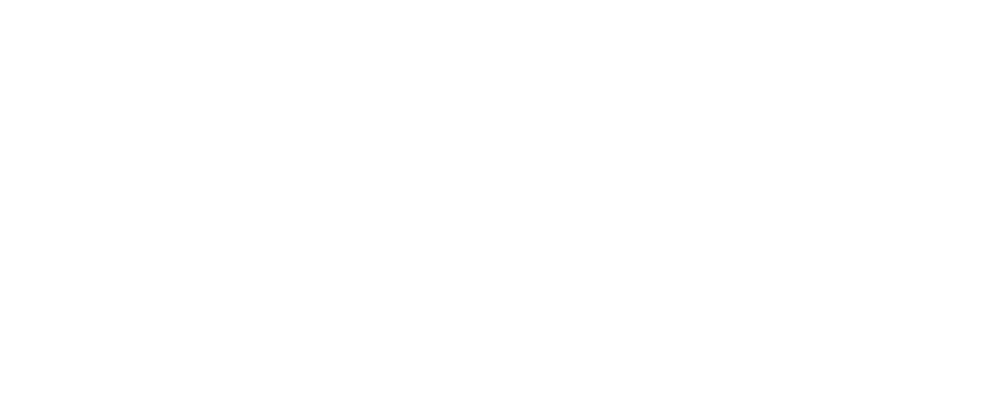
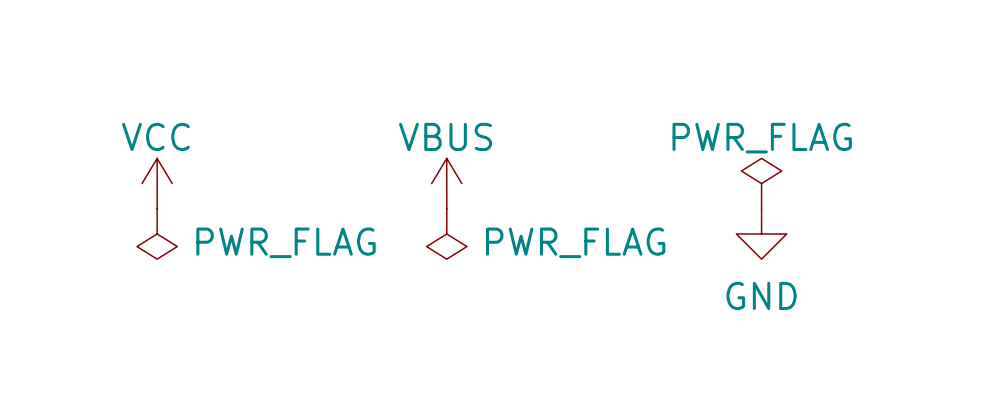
power symbol: none -> VCC (157, 183)
power symbol: none -> VBUS (446, 183)
power symbol: none -> PWR_FLAG (761, 183)
power symbol: none -> PWR_FLAG (157, 233)
power symbol: none -> PWR_FLAG (446, 233)
power symbol: none -> GND (761, 233)

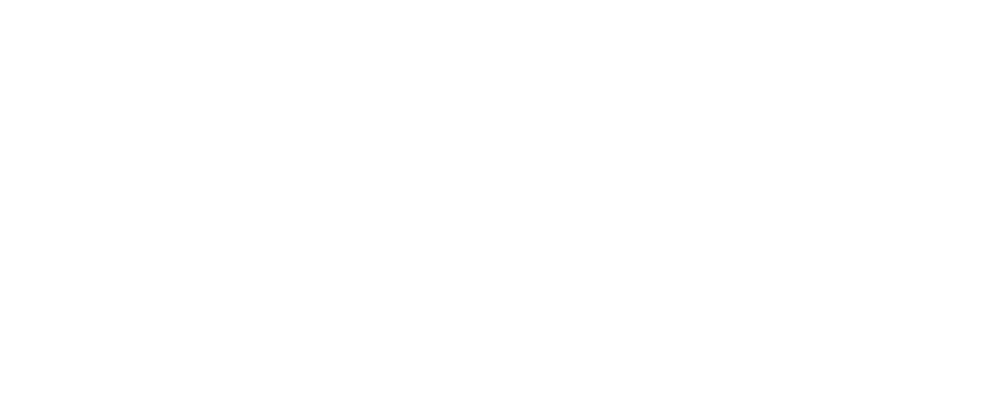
power symbol: VCC (157, 183) -> none
power symbol: VBUS (446, 183) -> none
power symbol: PWR_FLAG (761, 183) -> none
power symbol: PWR_FLAG (157, 233) -> none
power symbol: PWR_FLAG (446, 233) -> none
power symbol: GND (761, 233) -> none

